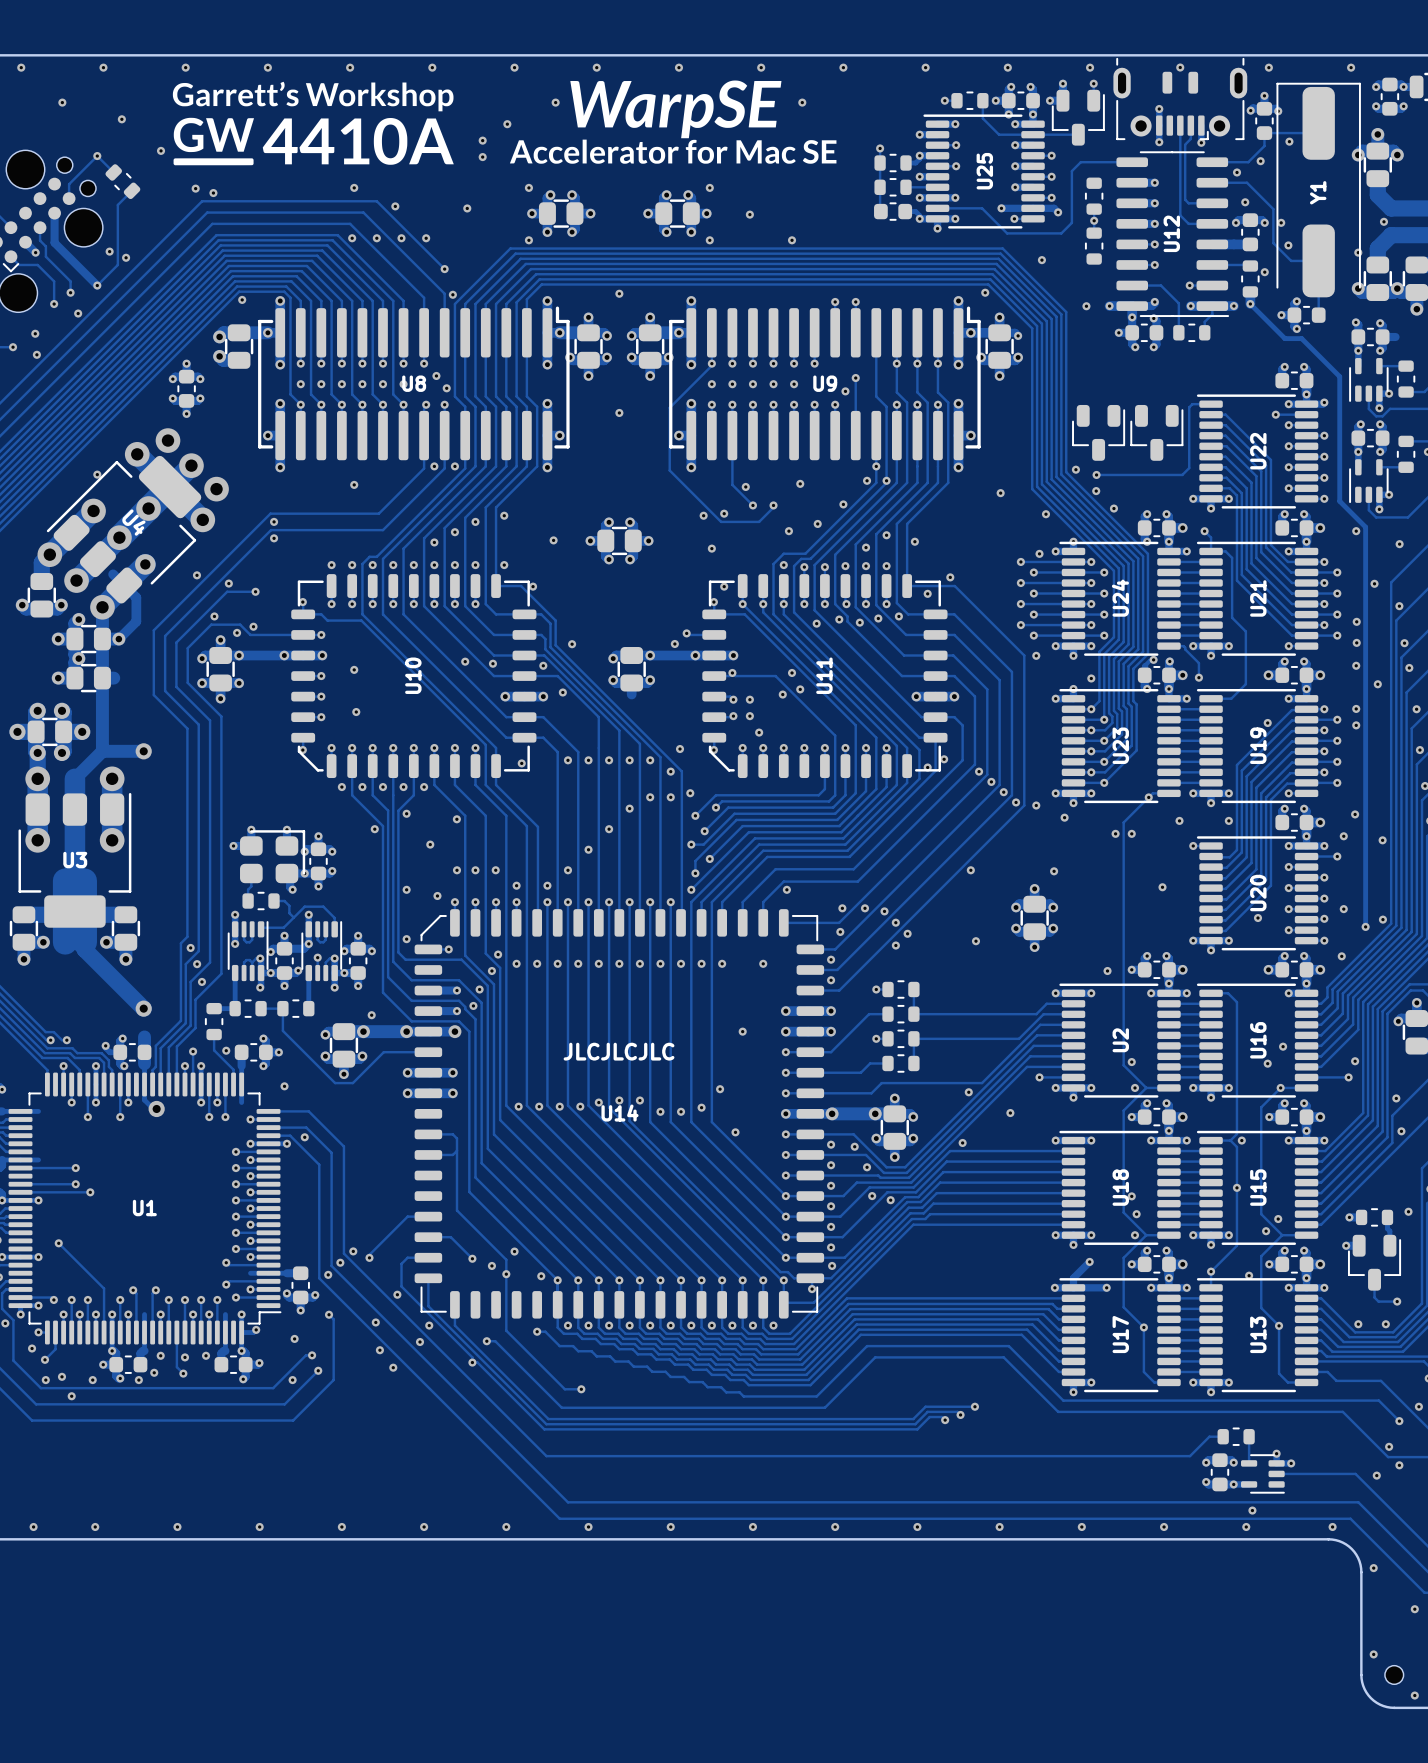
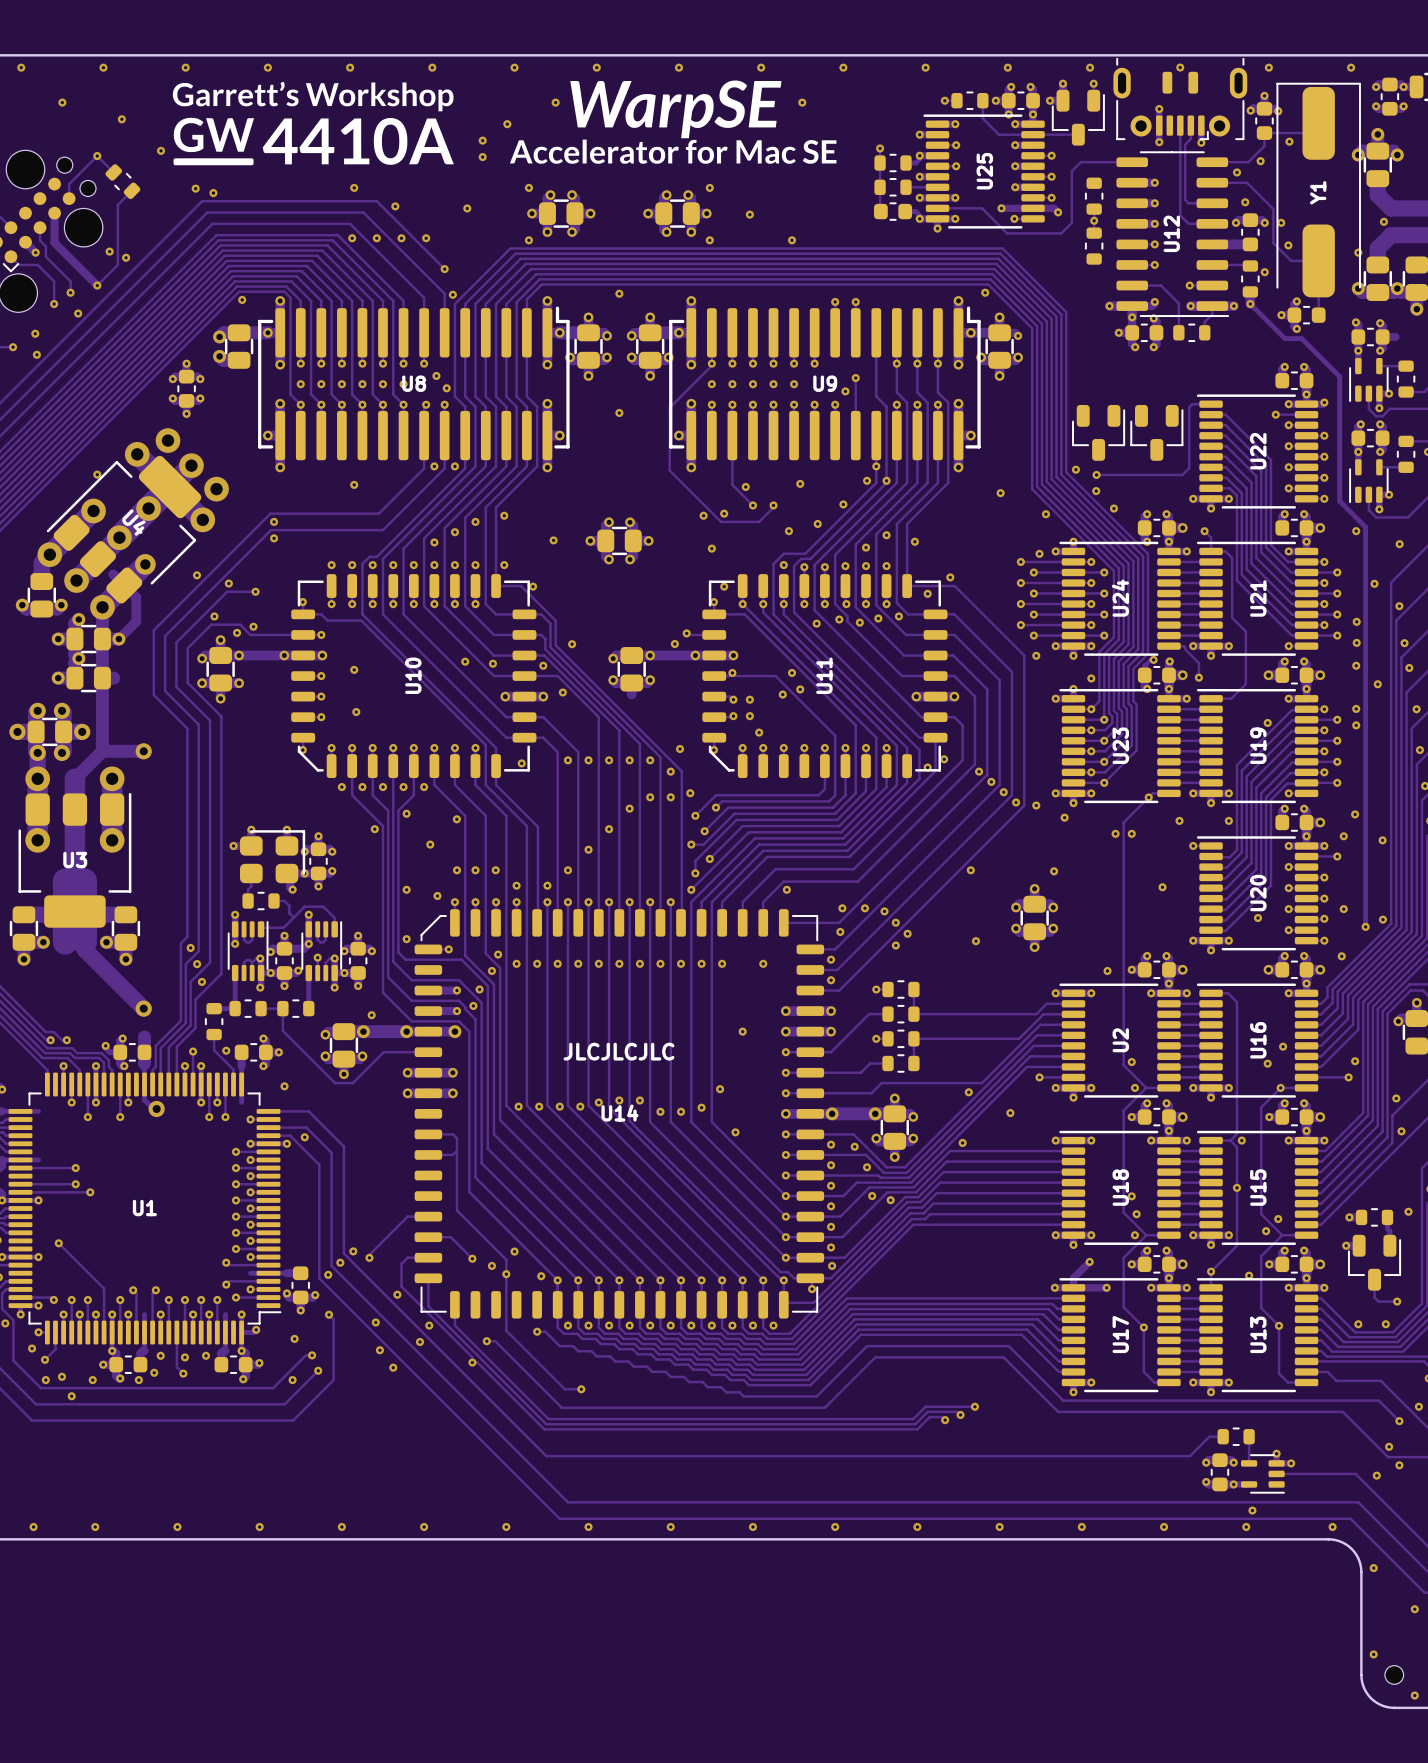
via: (1041, 260) -> none
via: (1086, 306) -> none

